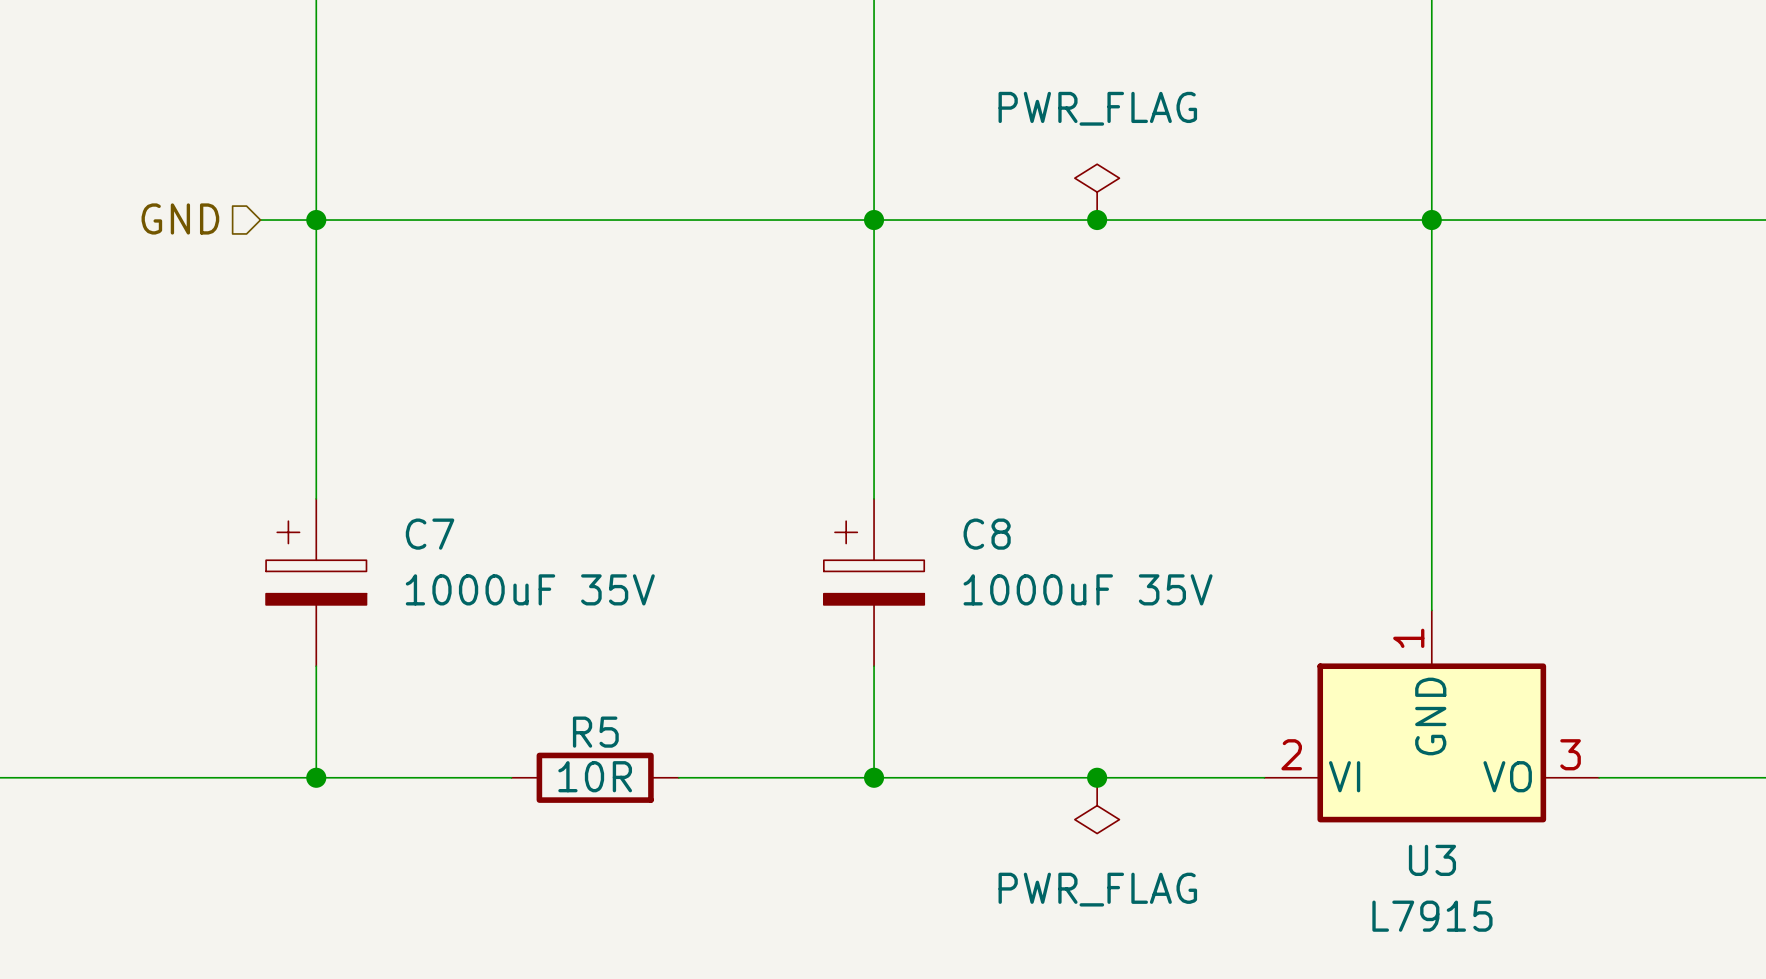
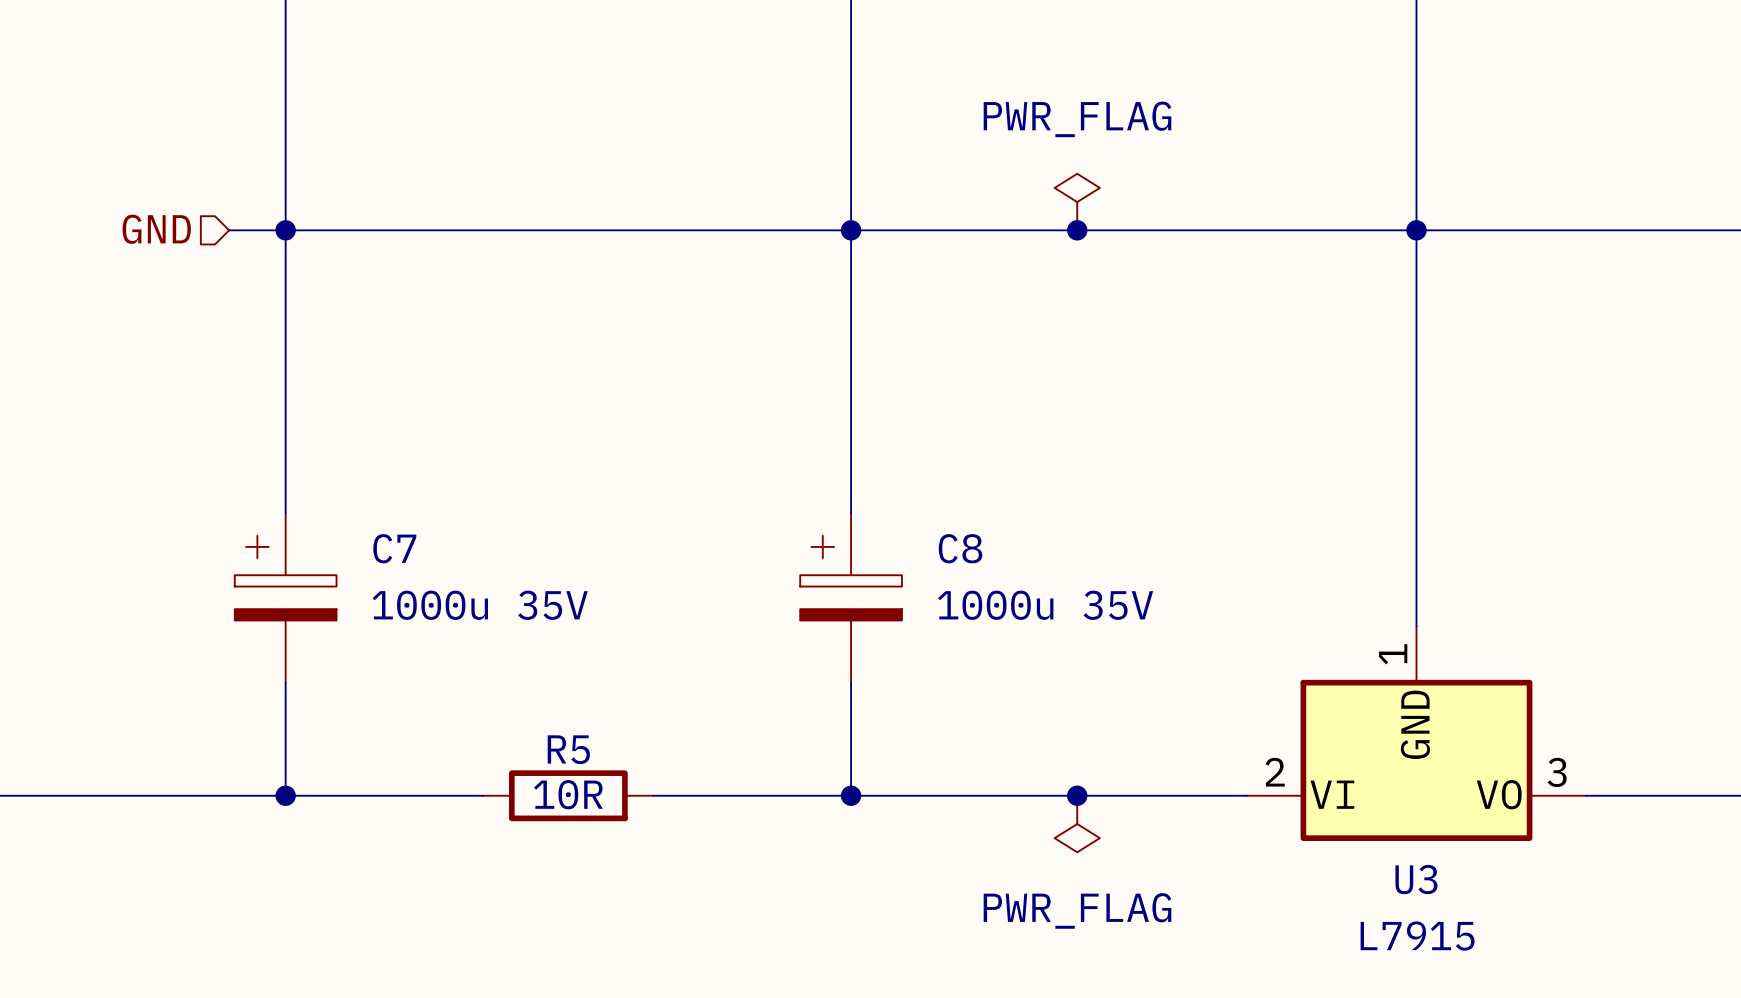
C7 value: 1000uF 35V (530, 589) -> 1000u 35V (480, 605)
C8 value: 1000uF 35V (1088, 589) -> 1000u 35V (1045, 605)

